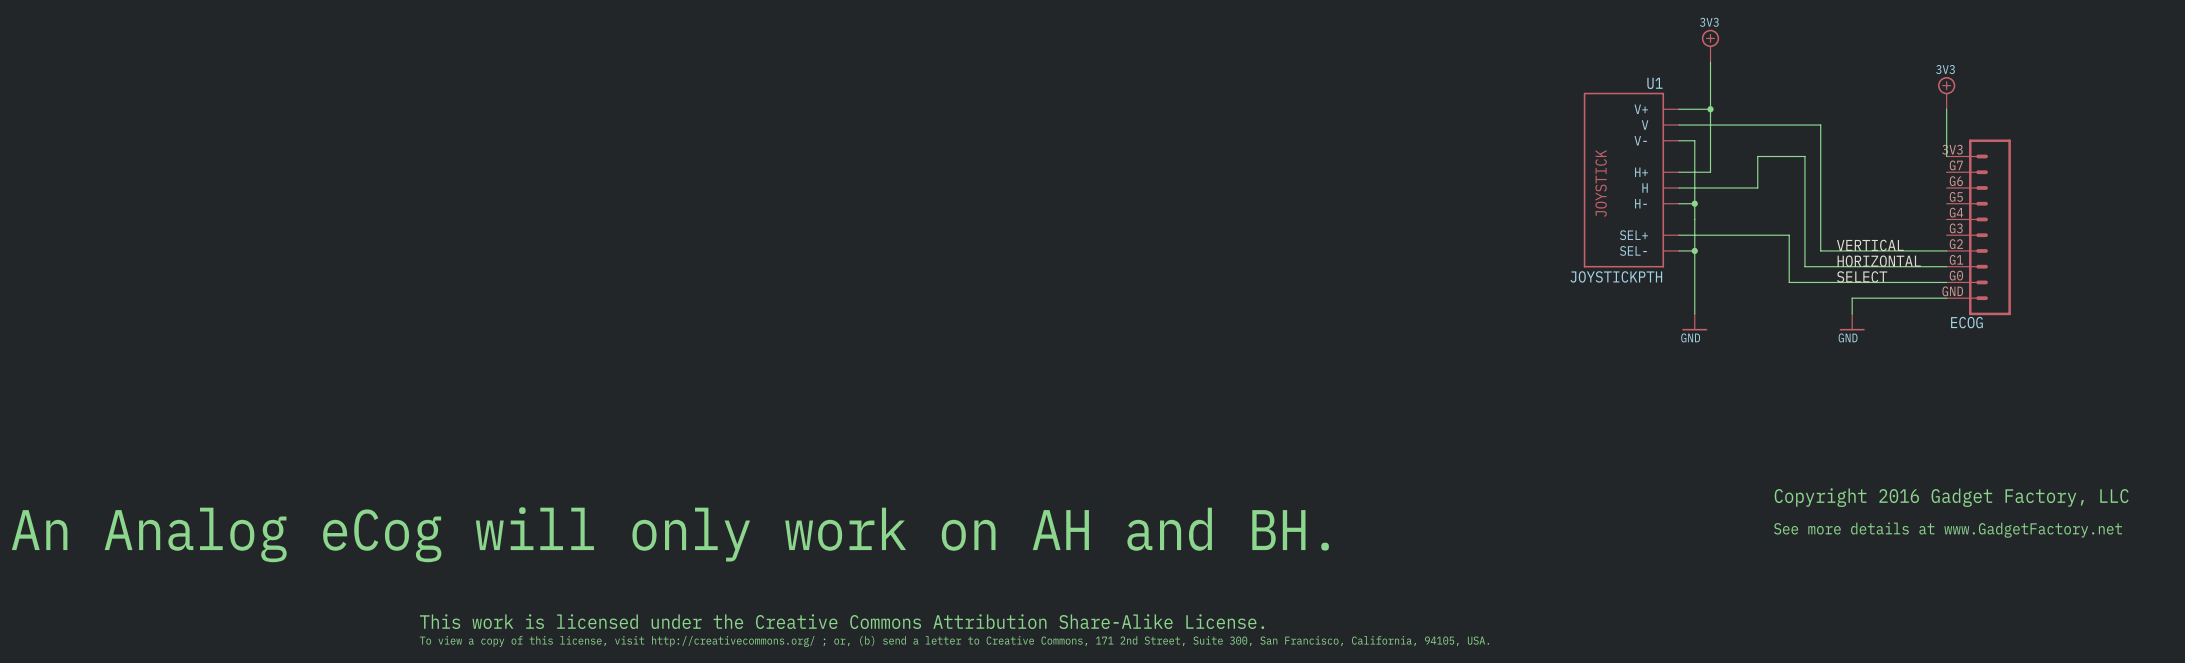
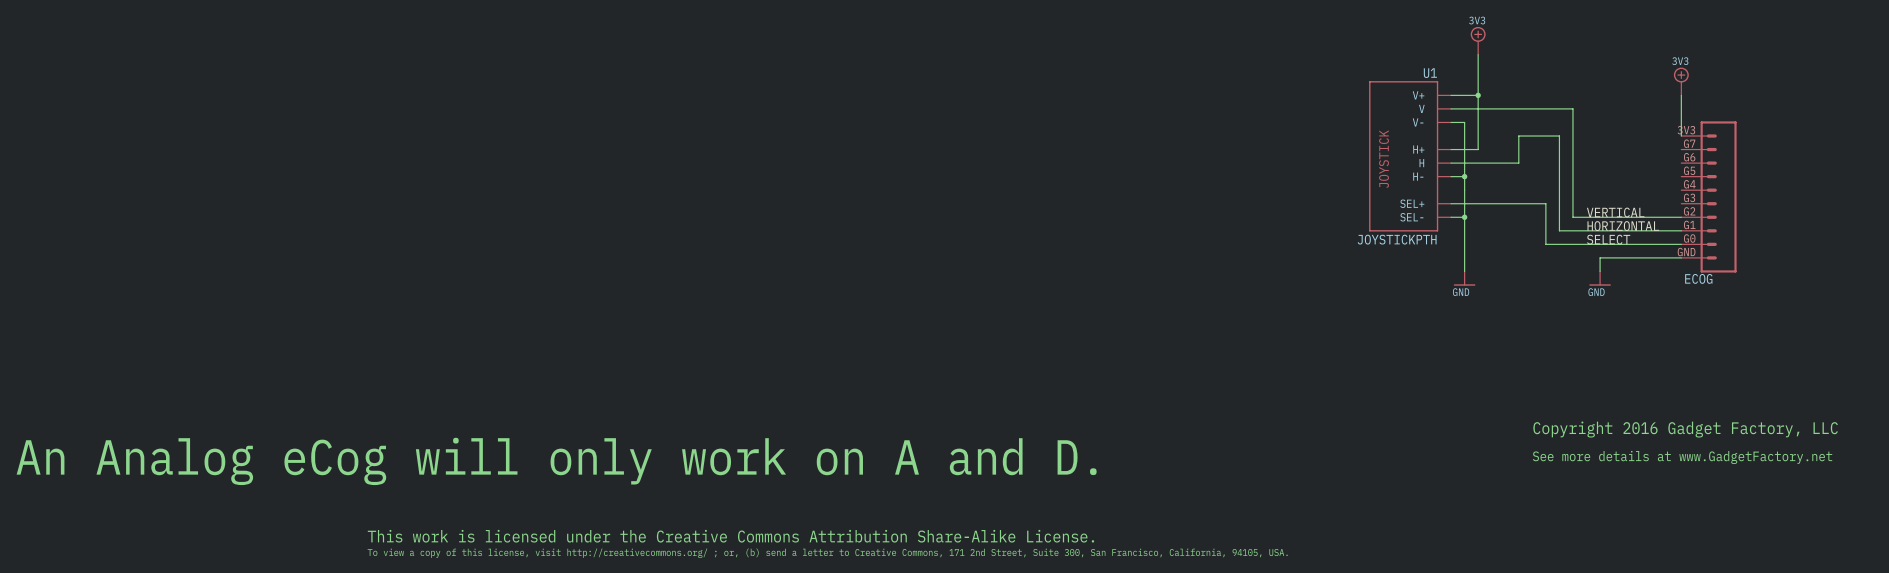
text: An Analog eCog will only work on AH and BH. (670, 534) -> An Analog eCog will only work on A and D. (556, 461)

